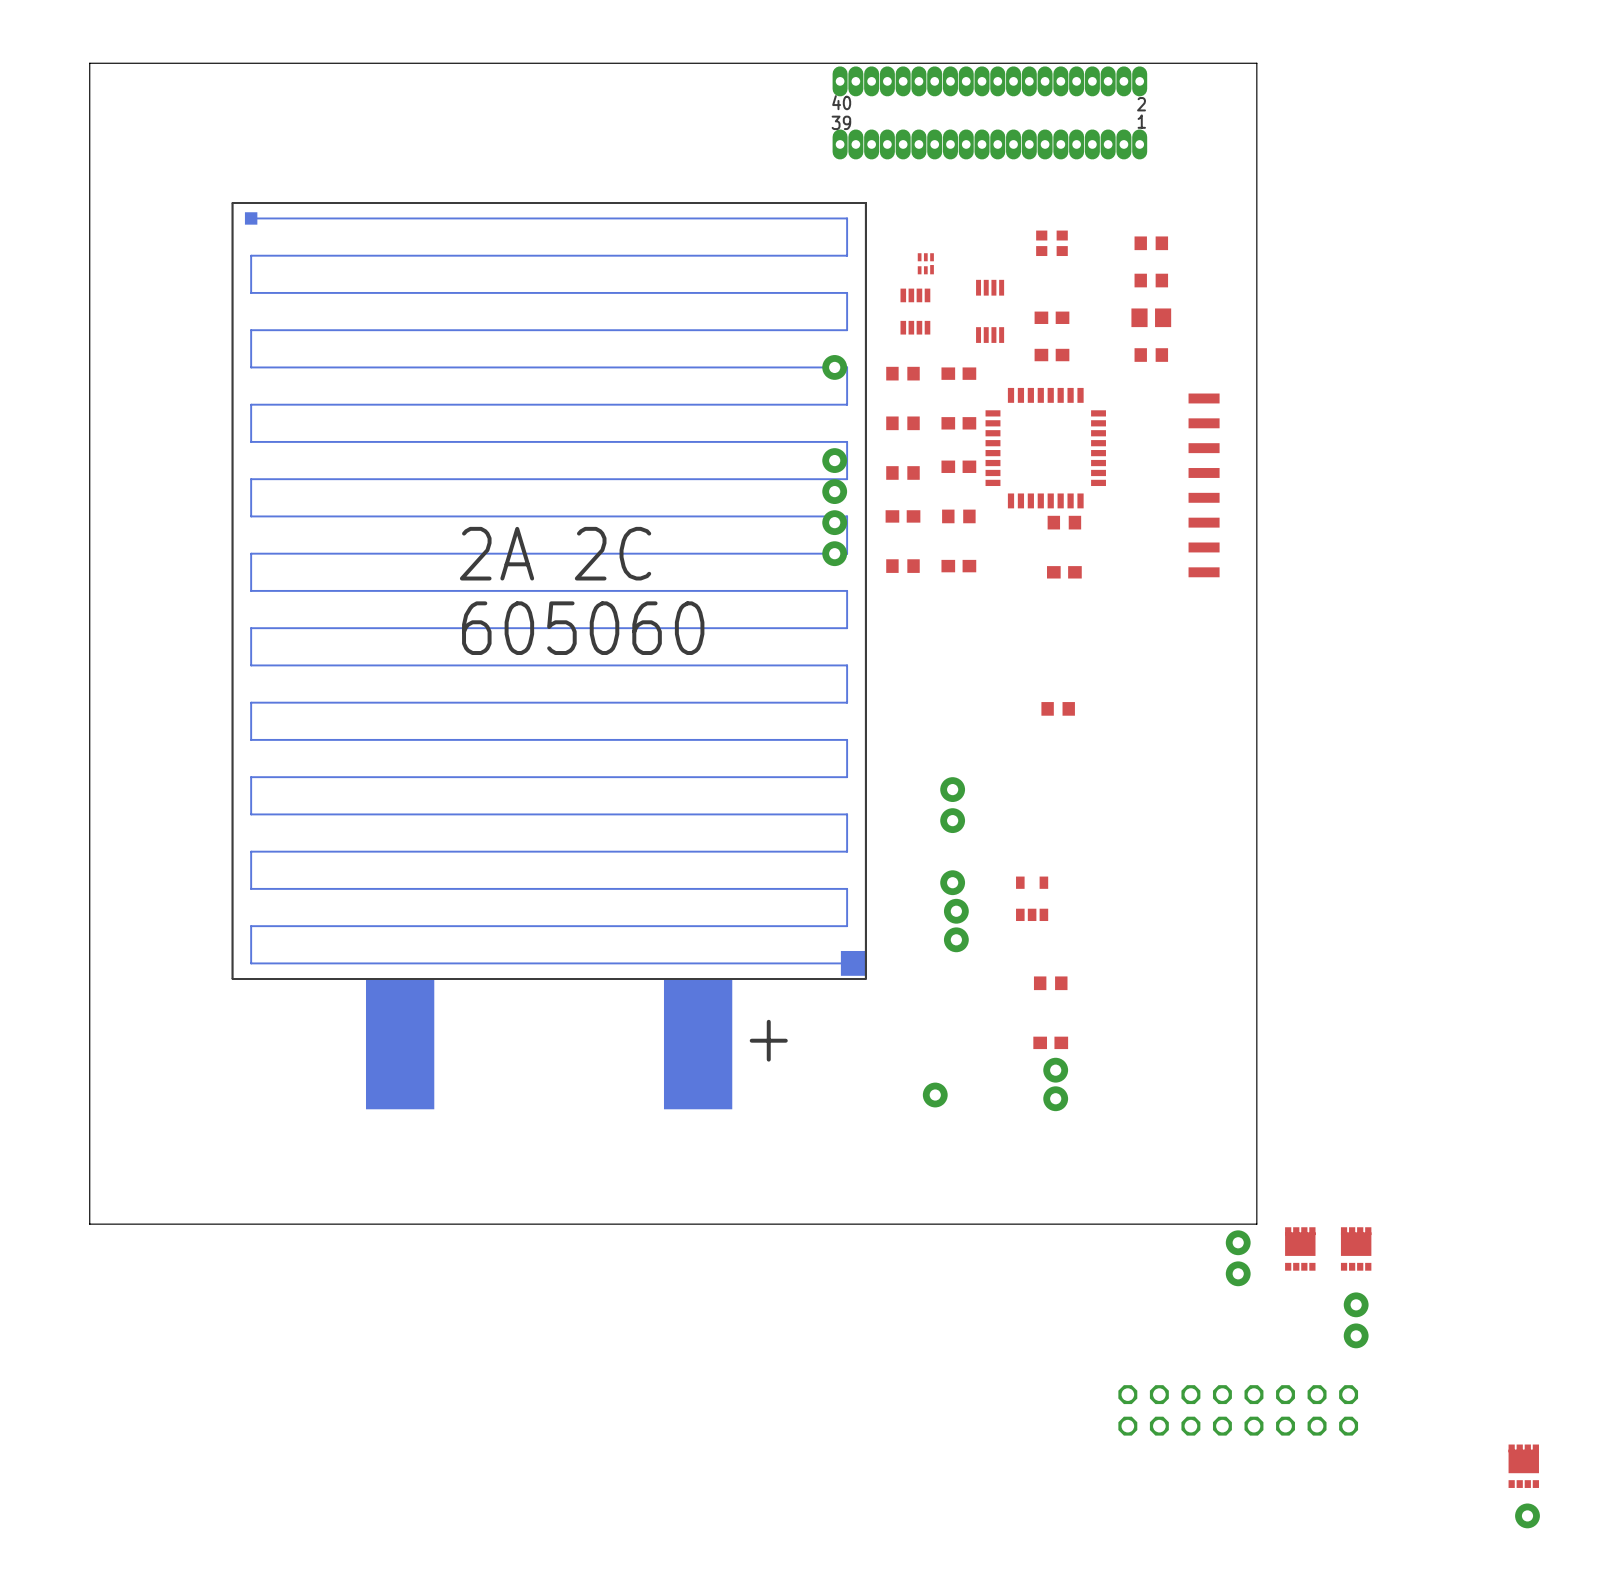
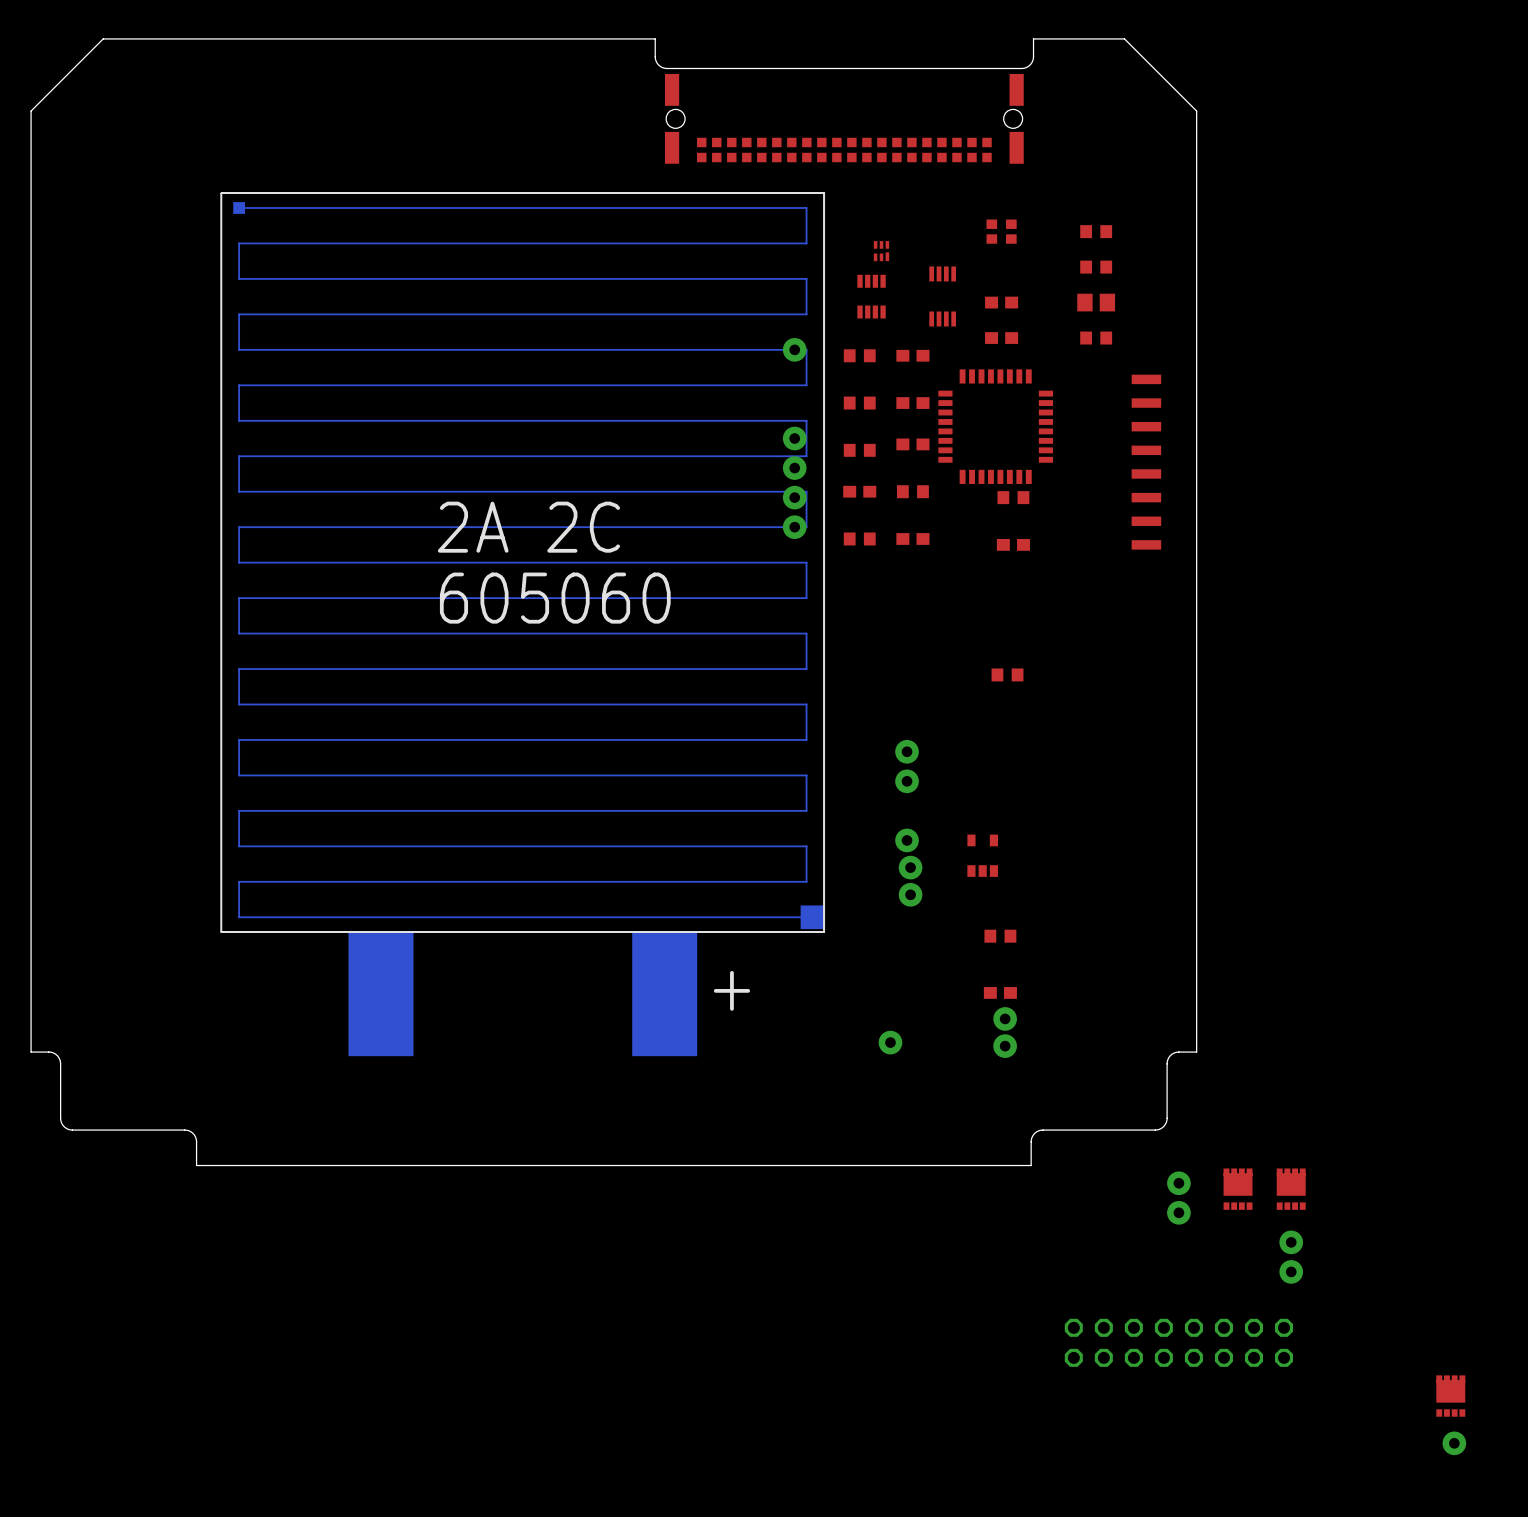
drawing: none -> [30, 38, 1198, 1167]
board edge: (1256, 63) (89, 63) (89, 1224) (1256, 1224) (1256, 63) -> none
part: (989, 112) -> none
part: none -> (844, 118)

